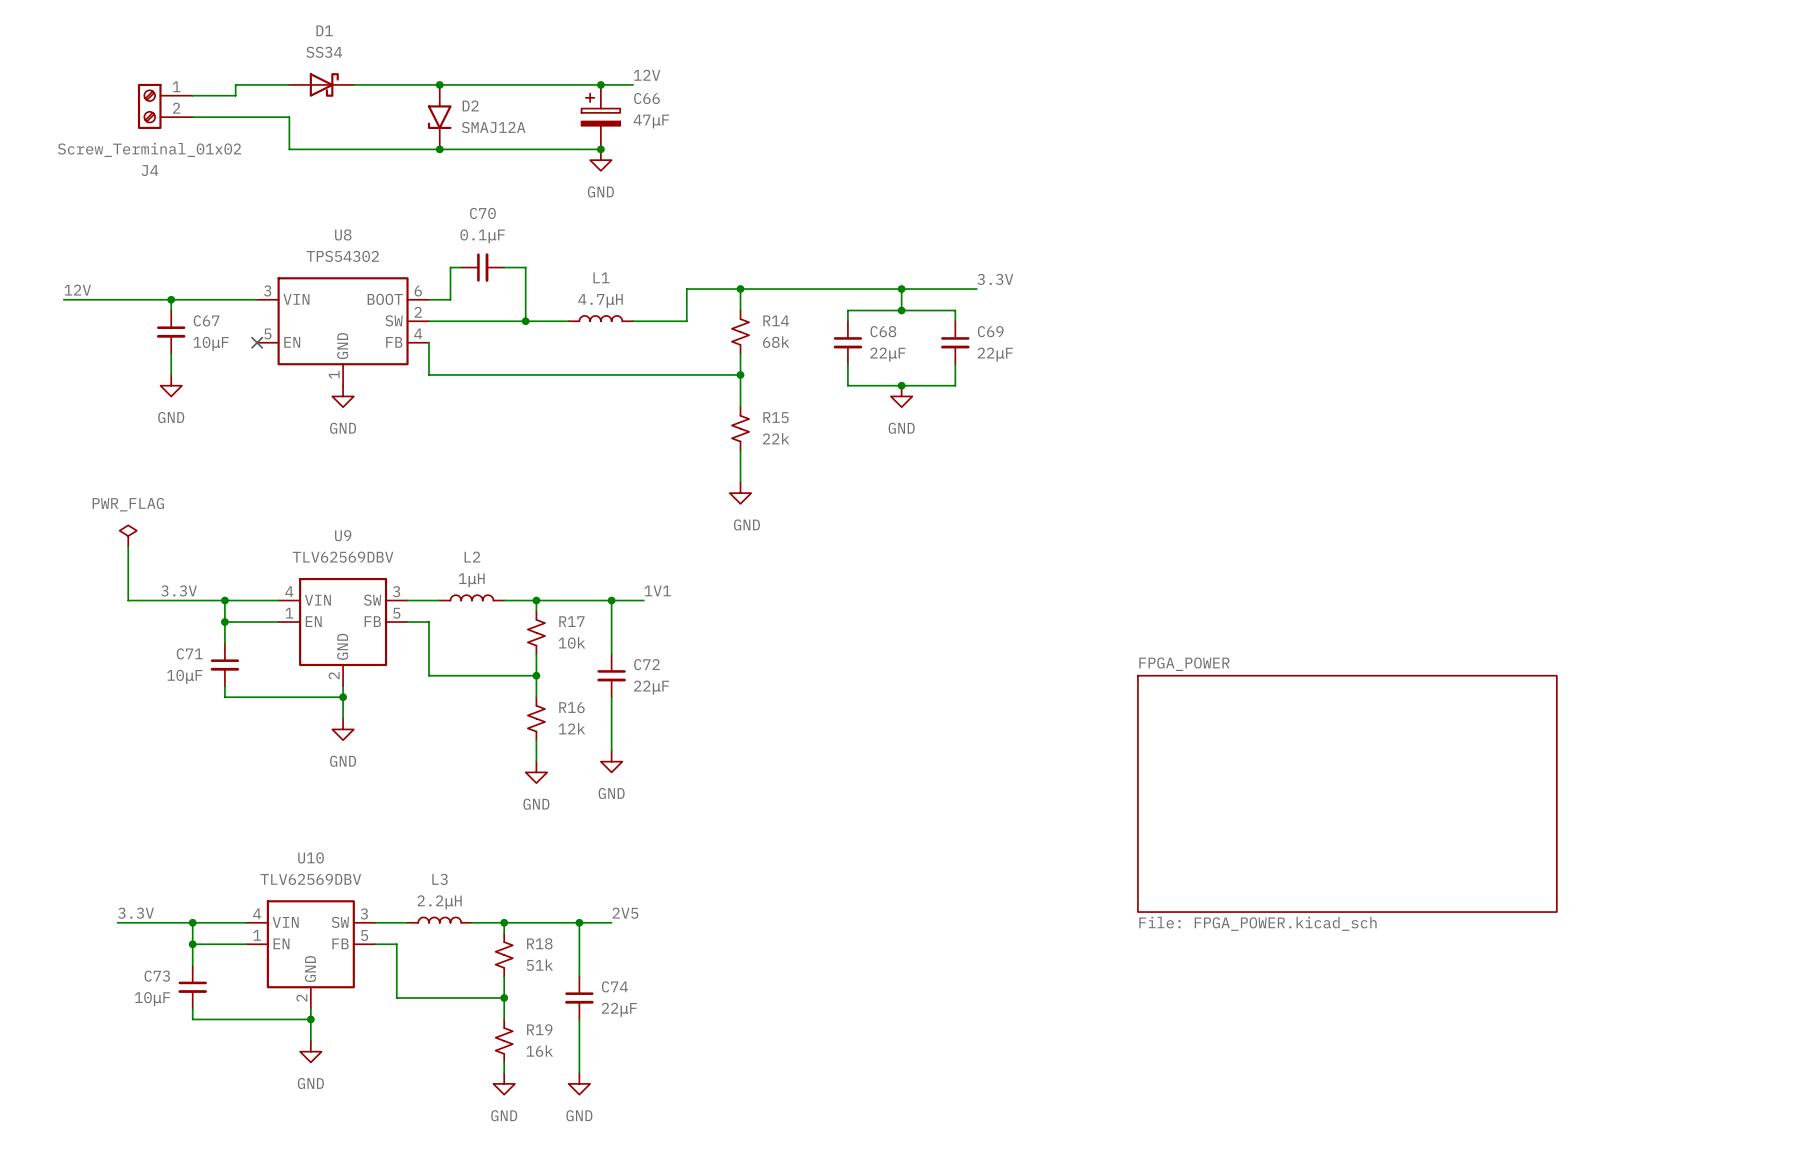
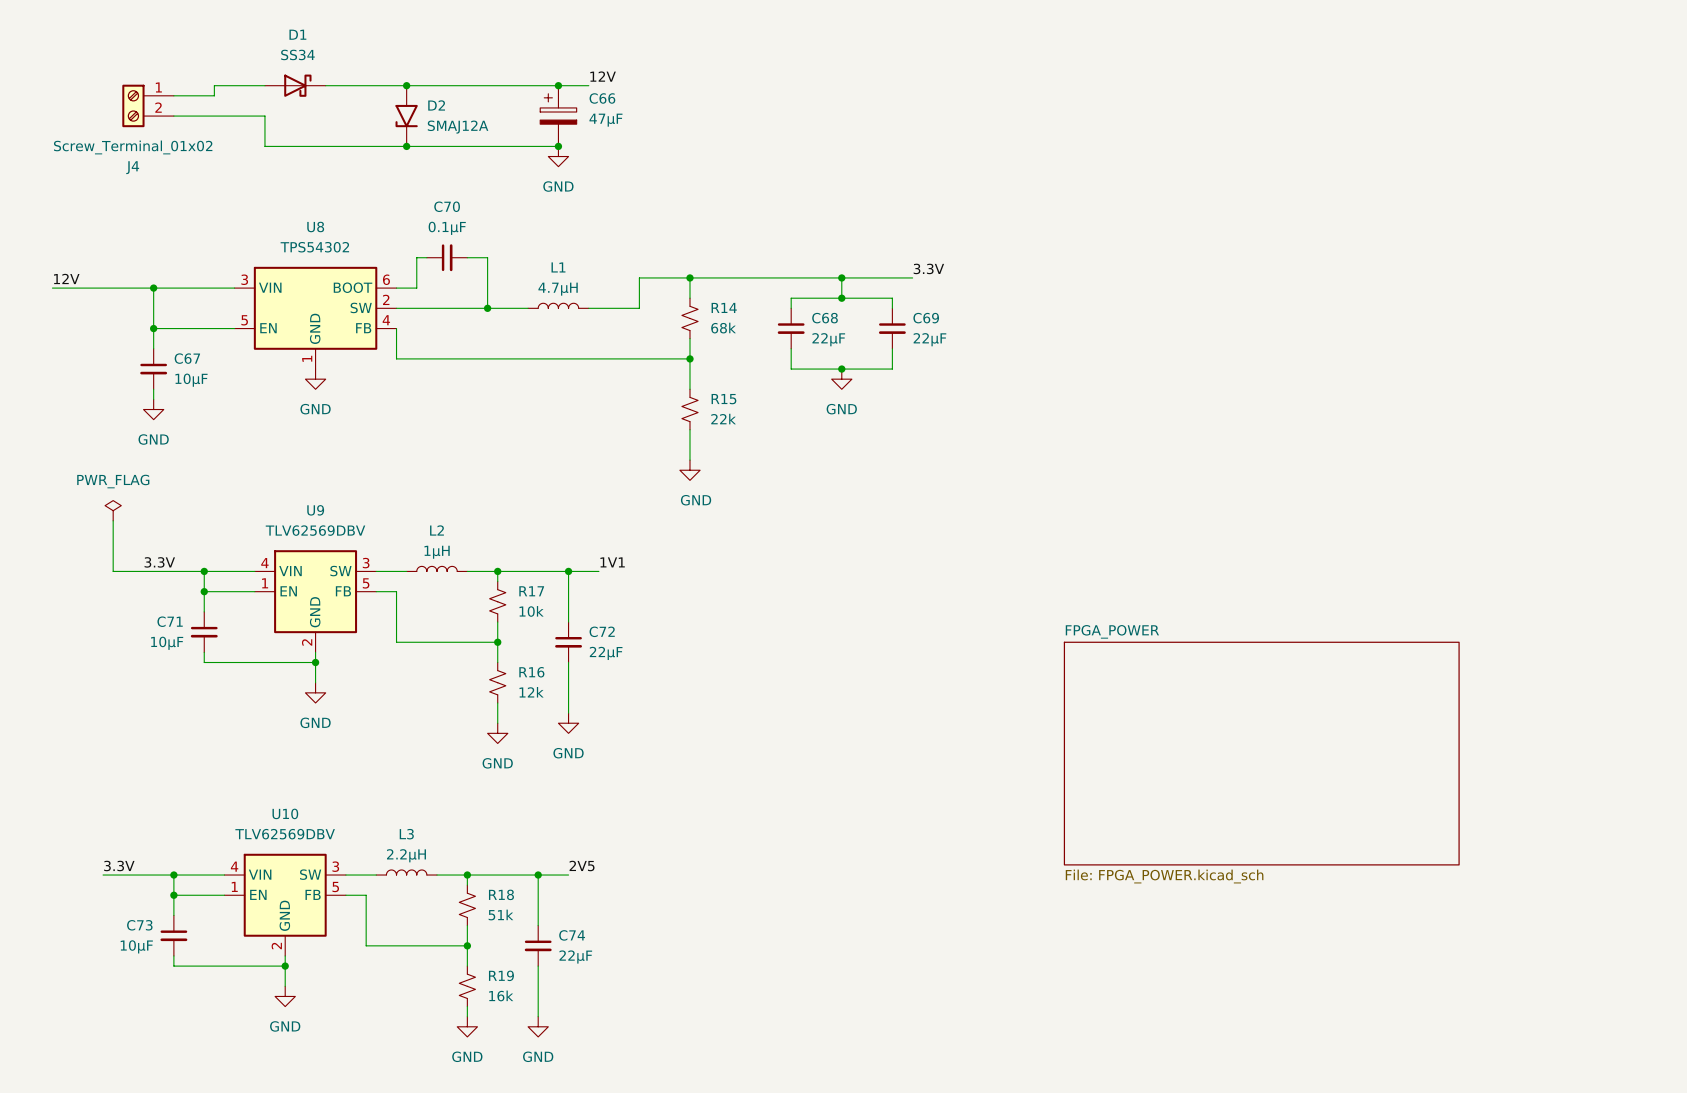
C67 position: (171, 332) -> (153, 369)
wire: none -> (153, 328) (234, 328)
junction: none -> (153, 328)
no-connect mark: (257, 342) -> none
power symbol position: GND (171, 385) -> GND (153, 409)

